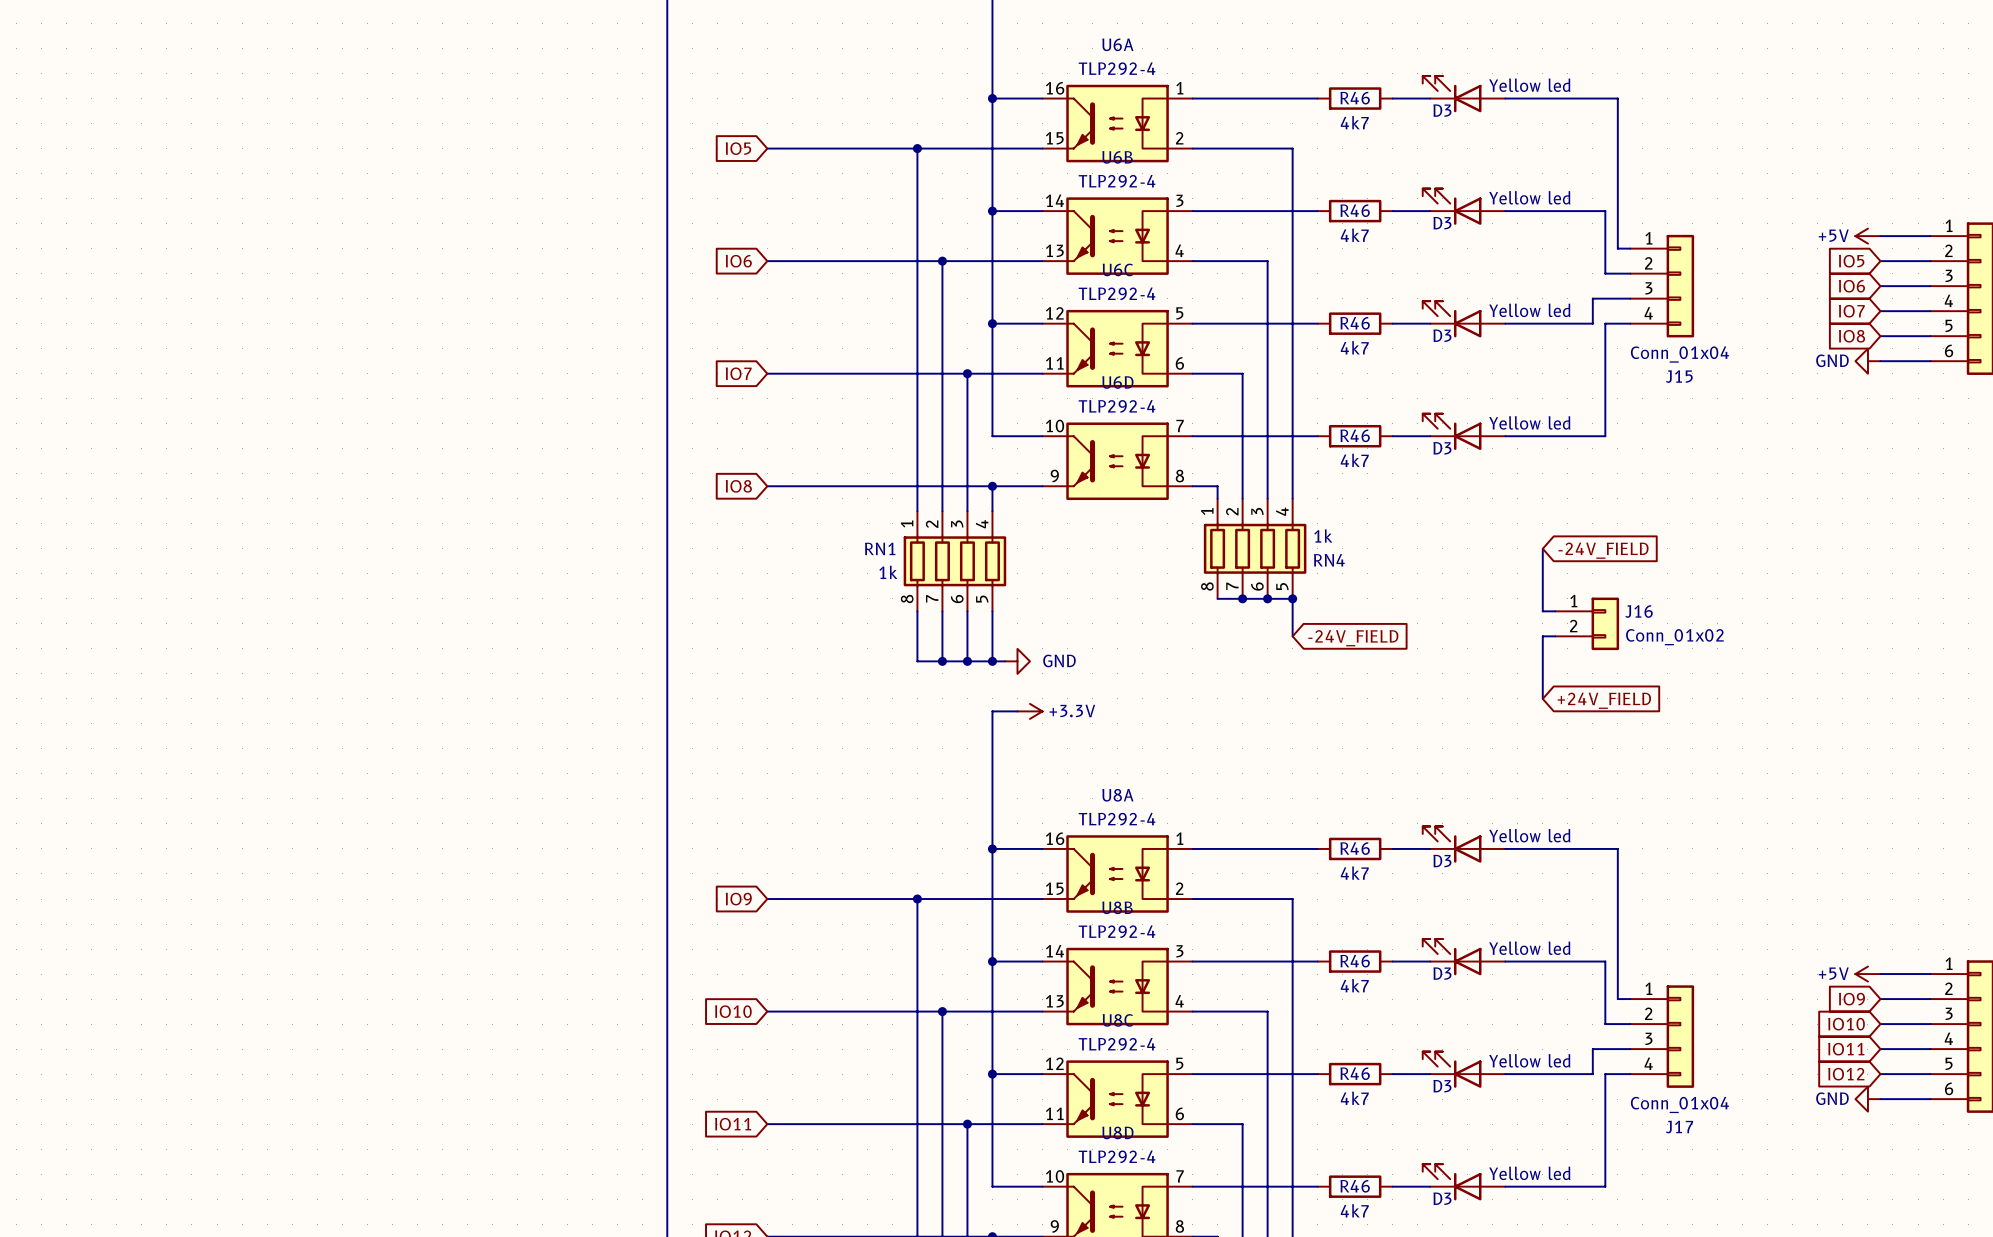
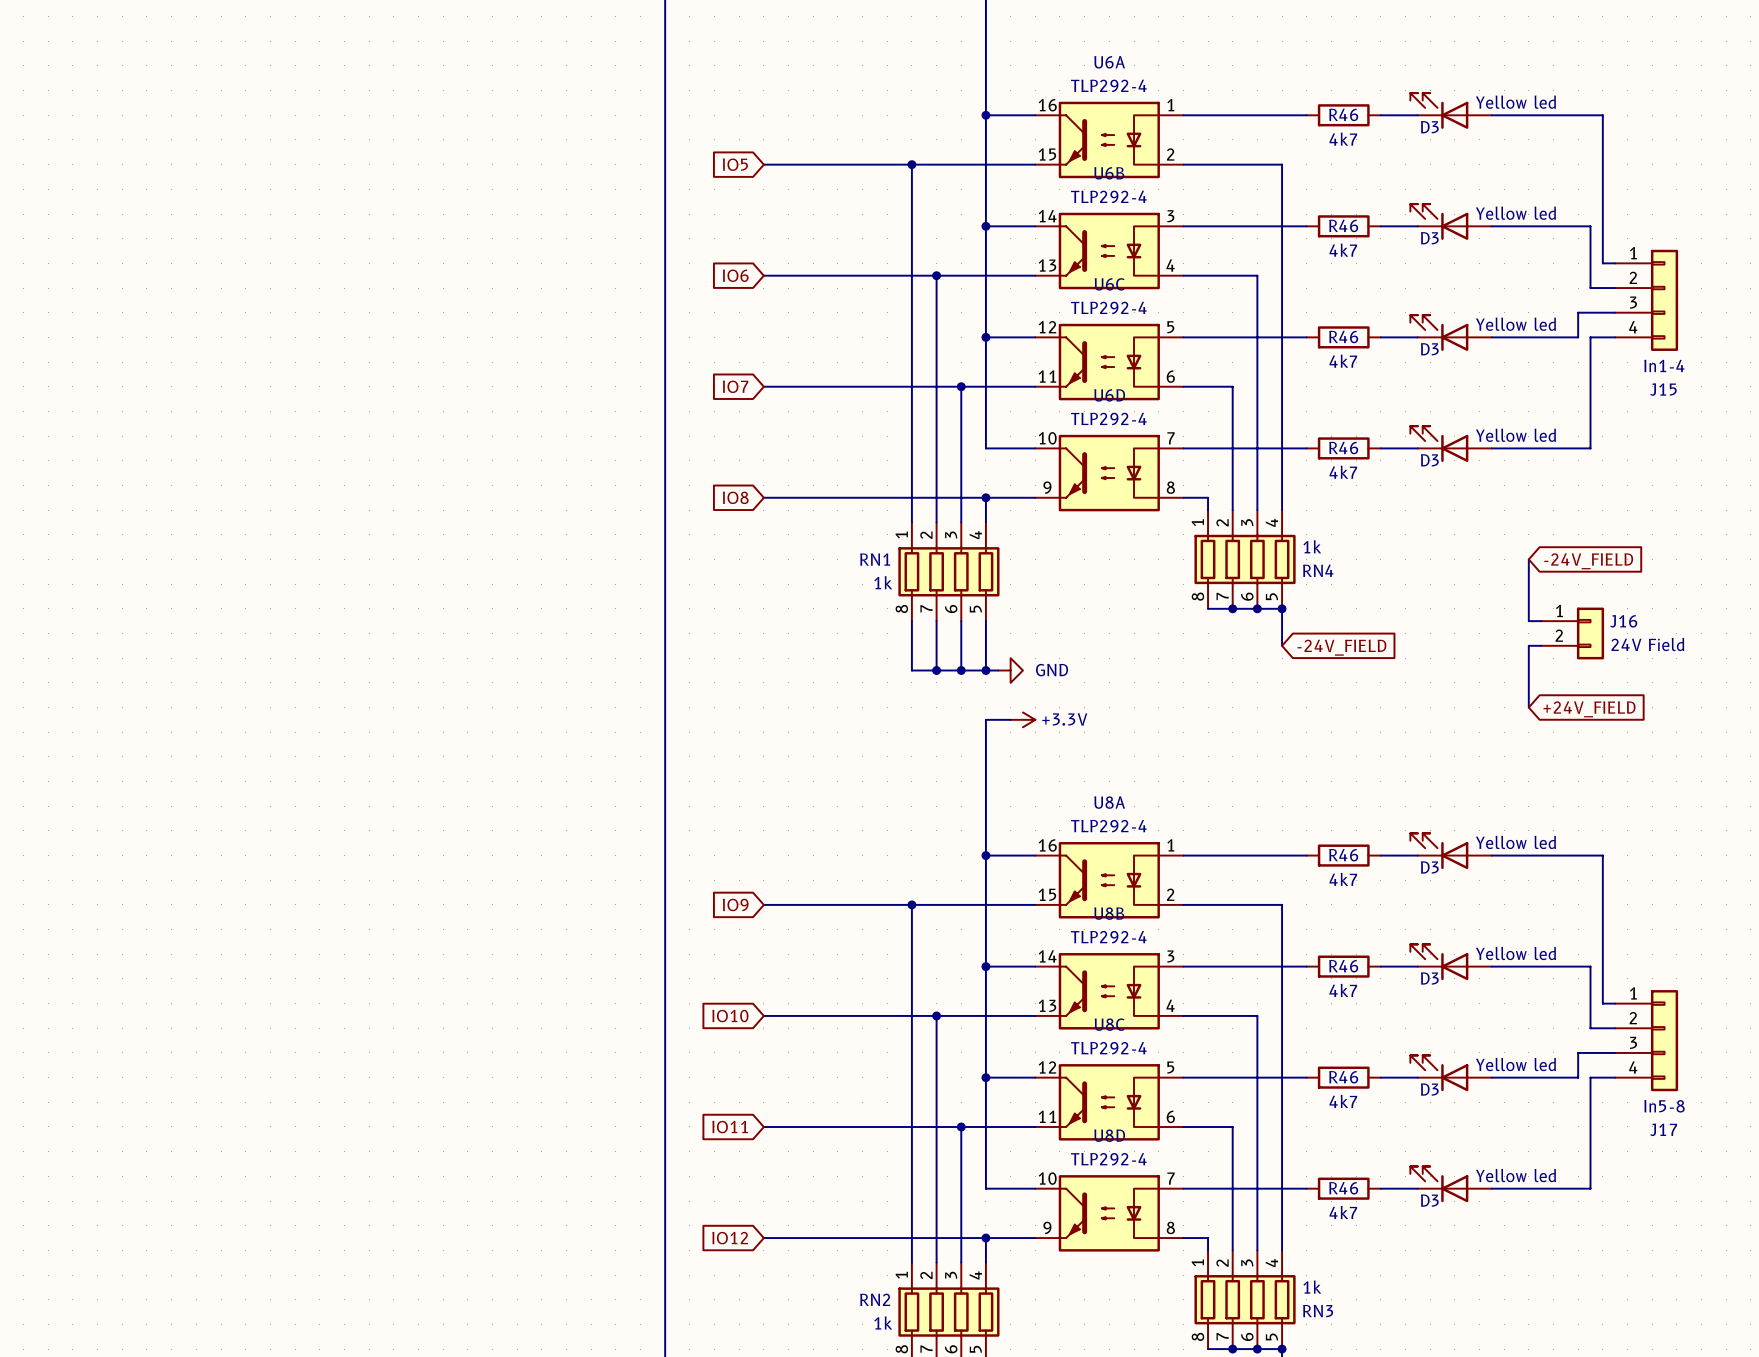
J15 value: Conn_01x04 (1679, 354) -> In1-4 (1664, 365)
J16 value: Conn_01x02 (1674, 637) -> 24V Field (1647, 644)
J17 value: Conn_01x04 (1679, 1104) -> In5-8 (1664, 1106)

